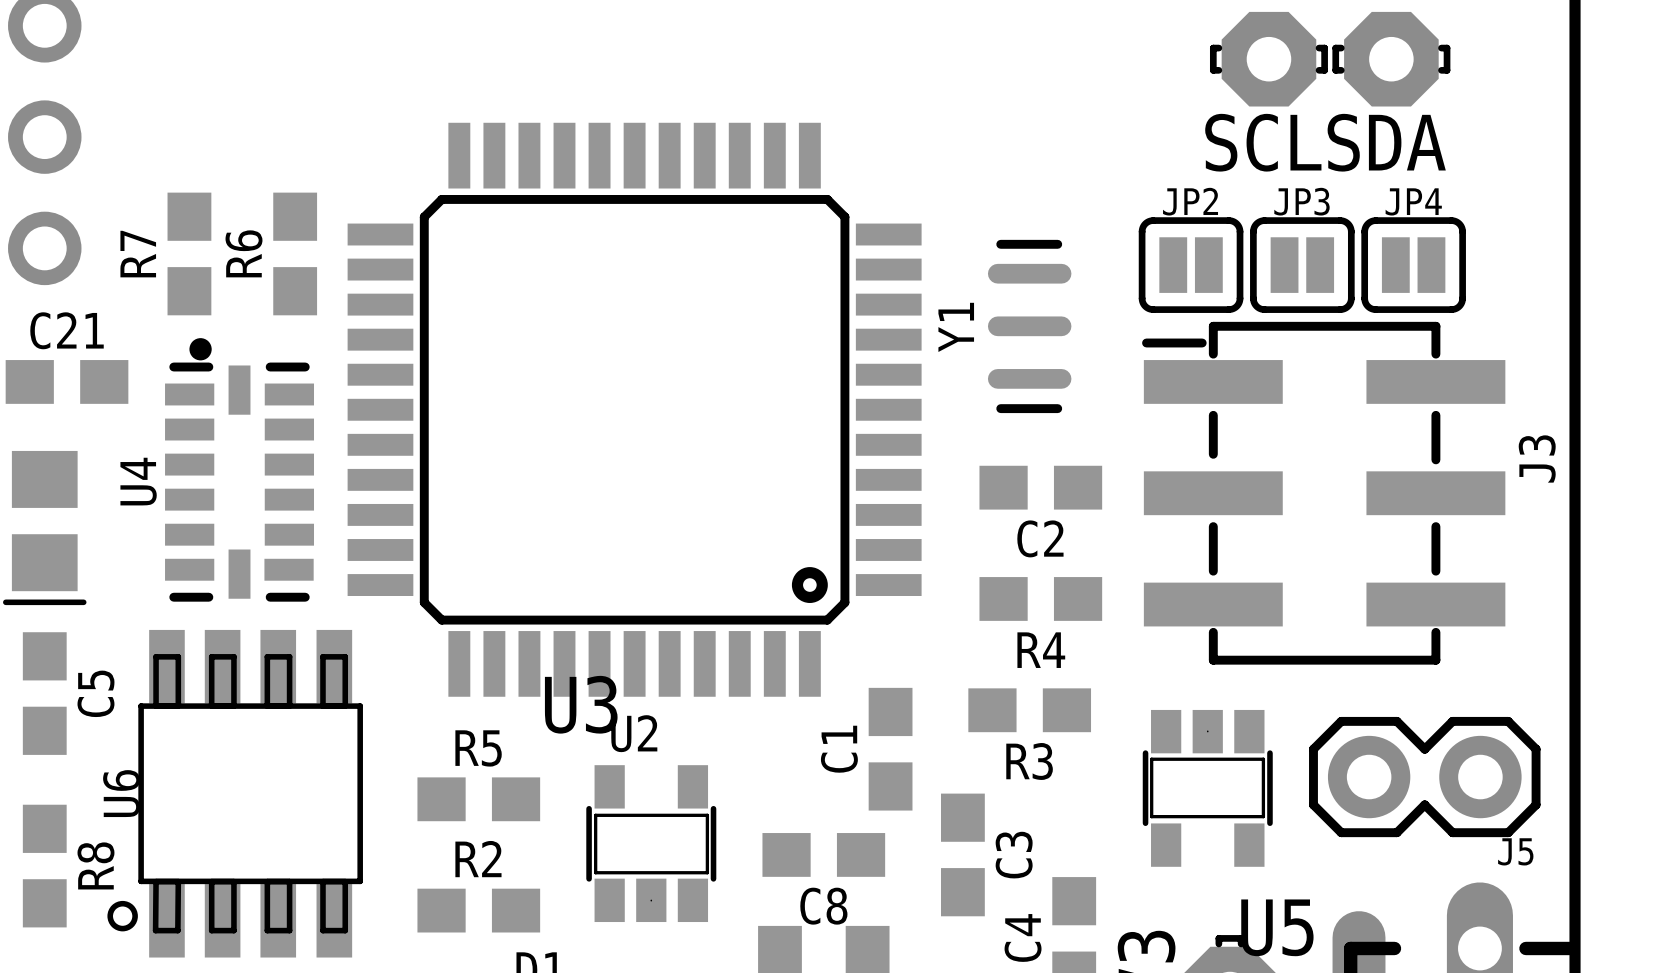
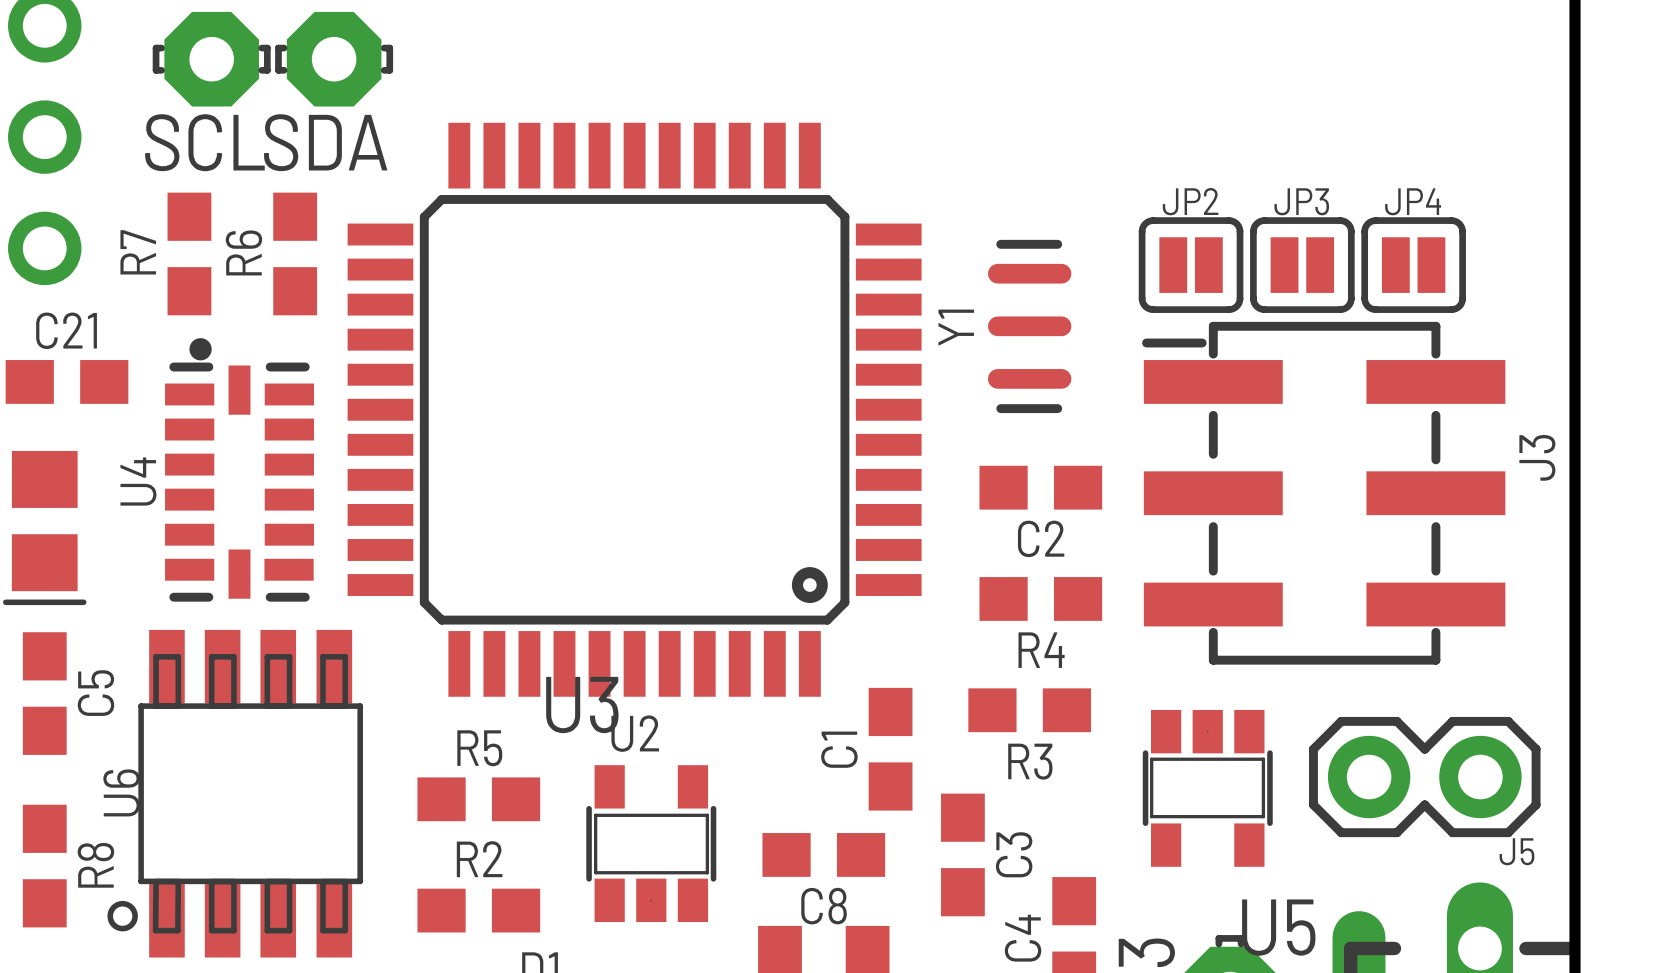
SCL position: (1268, 59) -> (211, 59)
SDA position: (1391, 59) -> (334, 59)

